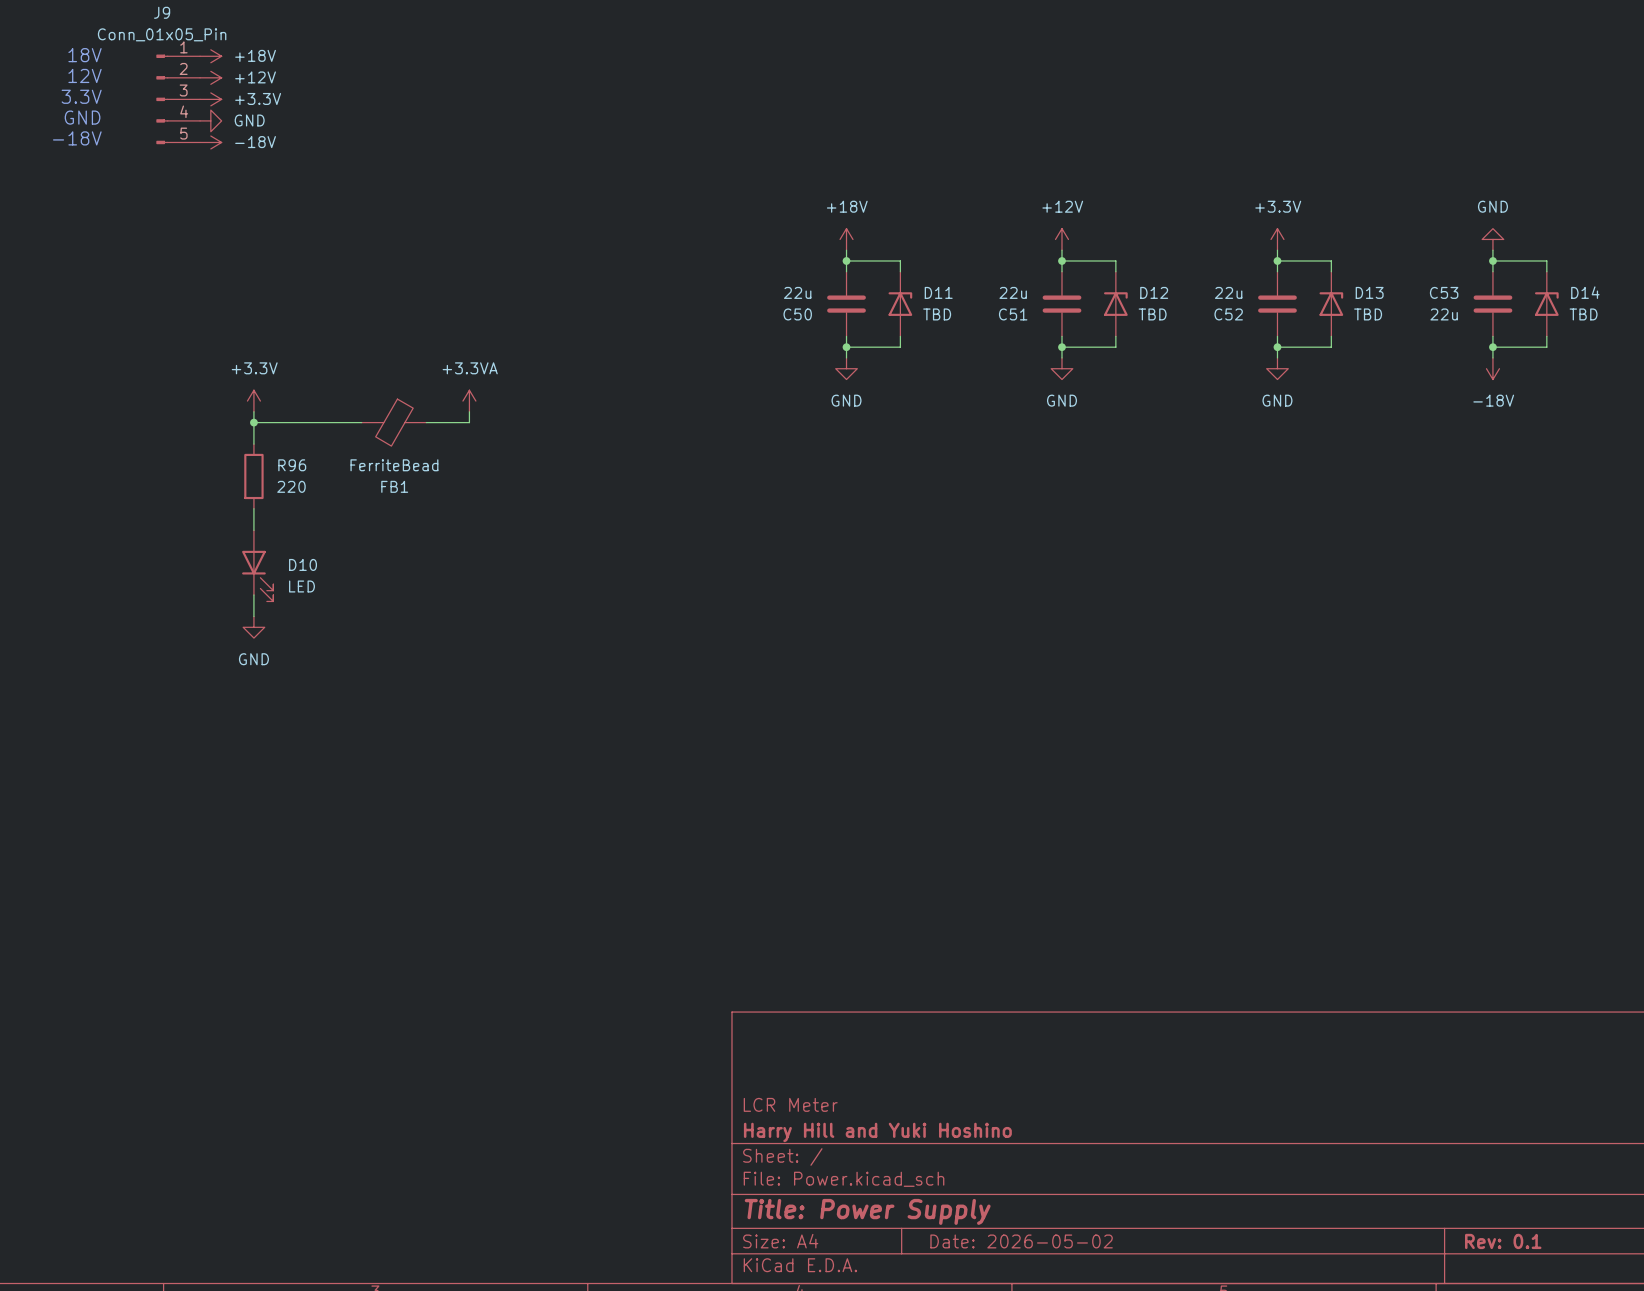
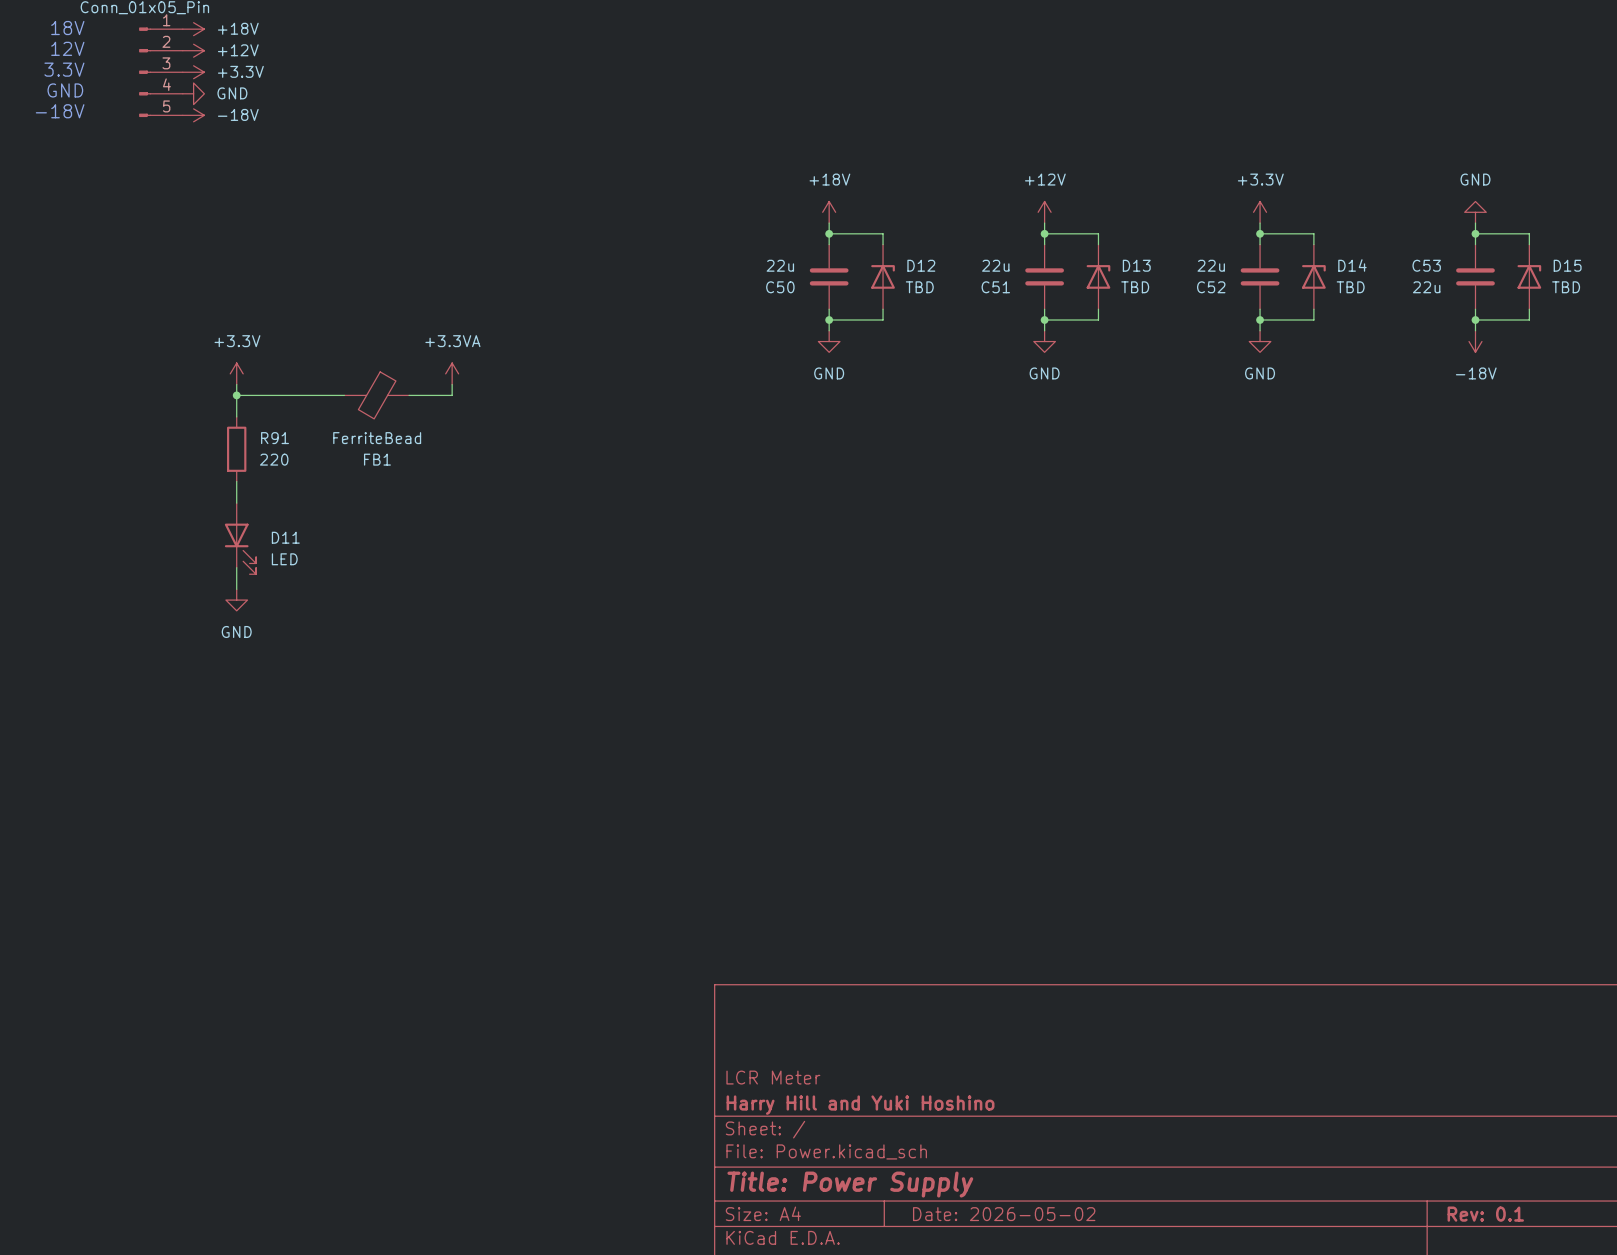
D11 name: D11 (938, 292) -> D12 (921, 265)
D12 name: D12 (1154, 292) -> D13 (1136, 265)
D13 name: D13 (1369, 292) -> D14 (1352, 265)
D14 name: D14 (1585, 292) -> D15 (1567, 265)
R96 name: R96 (292, 465) -> R91 (275, 438)
D10 name: D10 (303, 564) -> D11 (285, 537)

